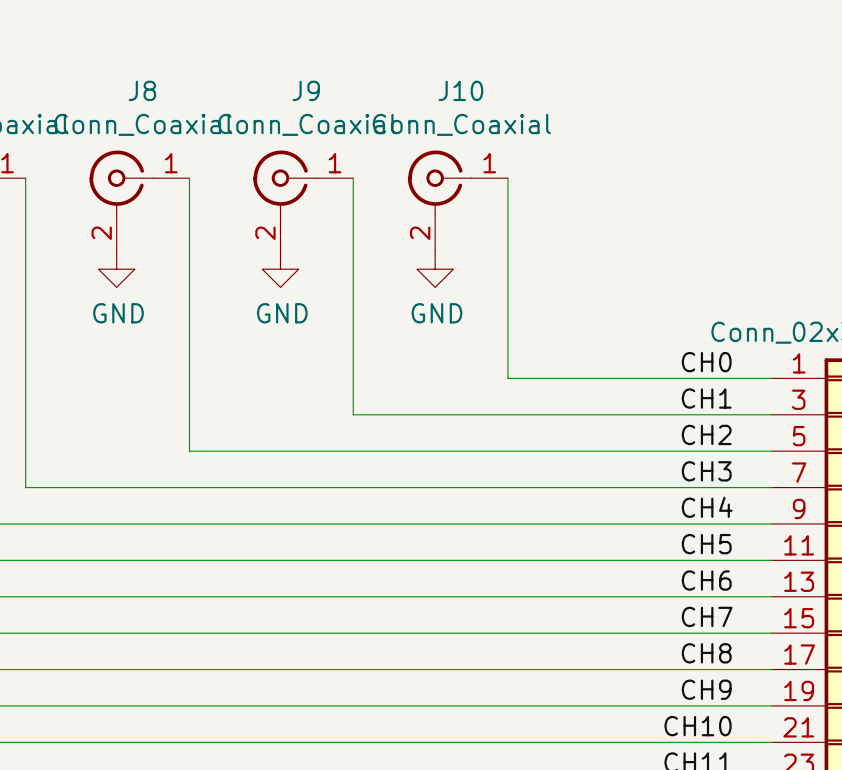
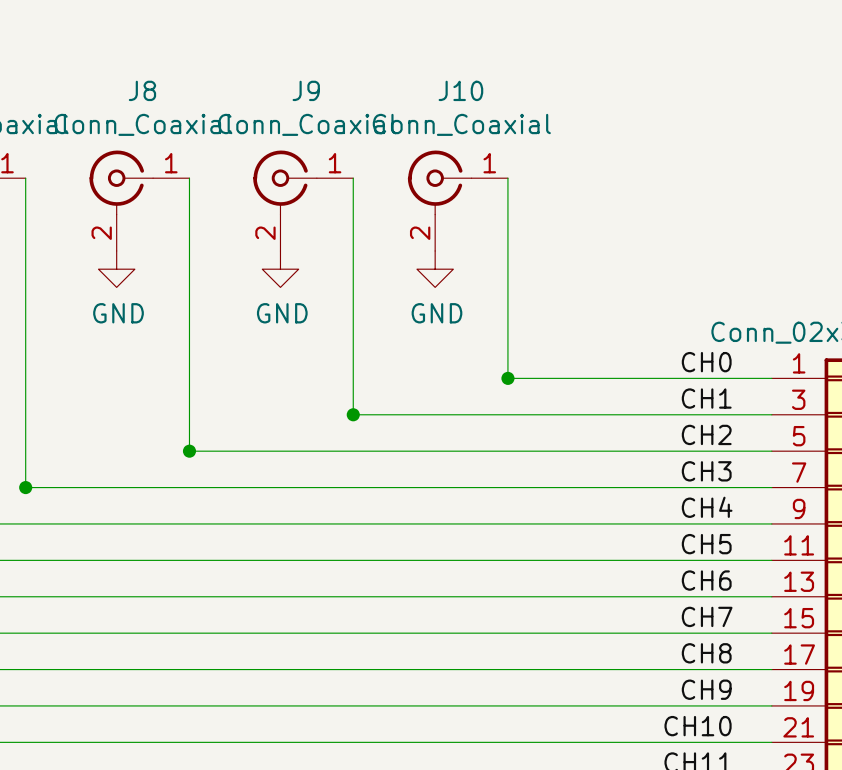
junction: none -> (507, 378)
junction: none -> (353, 414)
junction: none -> (189, 451)
junction: none -> (25, 487)

